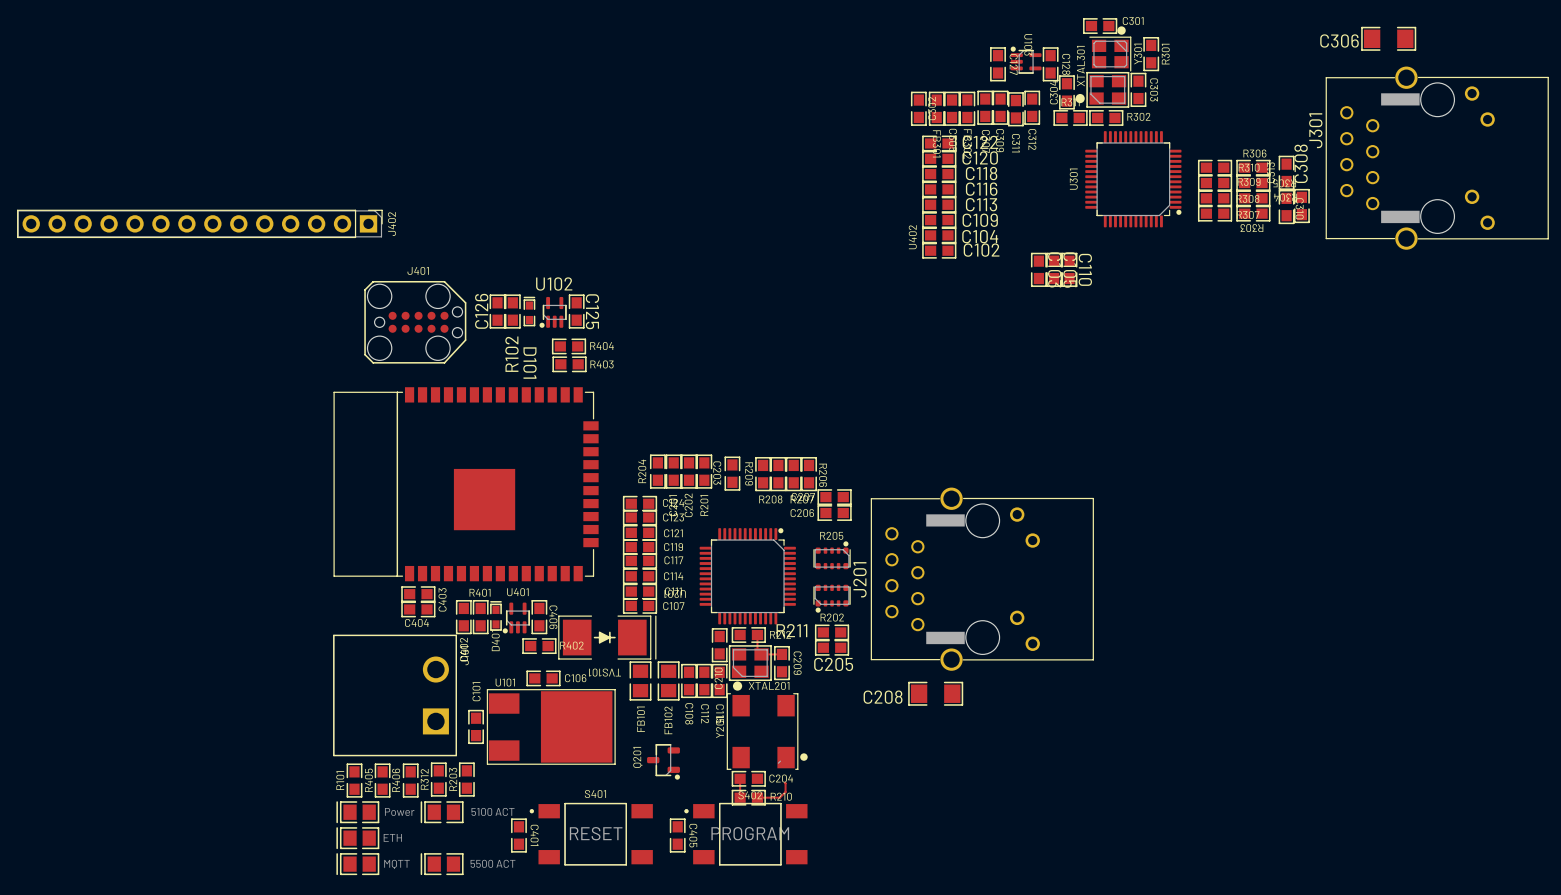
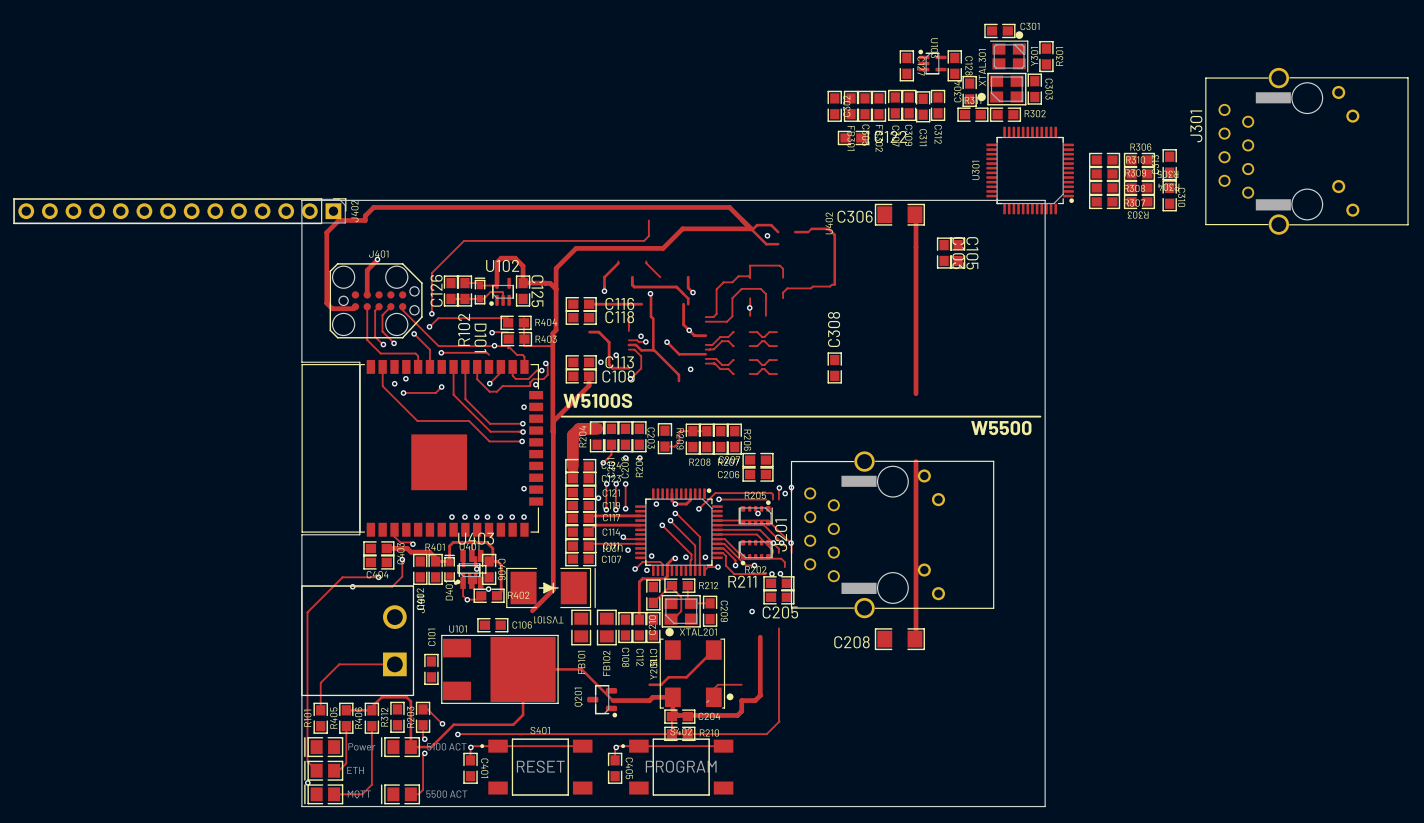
C306 position: (1388, 38) -> (899, 214)
C120: (939, 158) -> none
C118 position: (939, 174) -> (581, 317)
C116 position: (939, 189) -> (581, 304)
C113 position: (939, 204) -> (581, 362)
C308 position: (1301, 206) -> (834, 367)
board edge: none -> (301, 200) (301, 362) (359, 362) (359, 534) (301, 534) (301, 806) (1045, 806) (1045, 200) (301, 200)
C109 position: (939, 220) -> (581, 376)
track: none -> (915, 214) (916, 393)
track: none -> (648, 220) (649, 235) (644, 240) (464, 240) (431, 273) (431, 313)
C104: (939, 235) -> none
track: none -> (751, 228) (729, 207) (373, 207) (365, 215) (365, 220) (338, 220) (326, 232) (326, 303) (332, 308) (353, 308) (355, 306)
track: none -> (751, 228) (682, 228) (663, 248) (576, 248) (556, 268) (556, 330) (552, 333) (553, 432)
track: none -> (751, 228) (766, 244) (778, 244)
track: none -> (753, 228) (757, 225) (771, 225) (778, 232)
track: none -> (795, 232) (808, 232) (811, 228) (828, 228) (834, 234) (834, 284) (812, 286) (811, 288) (787, 288) (783, 292) (783, 298)
via: none -> (767, 235)
C102: (939, 250) -> none
C110: (1069, 269) -> none
via: none -> (377, 259)
track: none -> (378, 259) (367, 270) (367, 294)
track: none -> (618, 261) (604, 277) (604, 291)
track: none -> (646, 261) (660, 277)
track: none -> (632, 277) (634, 287) (676, 287) (688, 298) (688, 304)
track: none -> (688, 277) (688, 287) (693, 292)
track: none -> (783, 277) (783, 268) (779, 265) (750, 265) (750, 277) (738, 276) (732, 282) (723, 282) (716, 289) (716, 313) (713, 317) (705, 317)
track: none -> (464, 283) (494, 285) (497, 283) (497, 262) (501, 258) (515, 258) (523, 266) (523, 283) (550, 283) (556, 289)
via: none -> (604, 291)
via: none -> (693, 292)
via: none -> (650, 293)
track: none -> (651, 294) (651, 316) (652, 318)
track: none -> (750, 298) (750, 315)
track: none -> (450, 298) (483, 298) (490, 291) (502, 291) (503, 300)
track: none -> (589, 304) (641, 304)
track: none -> (683, 304) (683, 324) (694, 335) (705, 335)
track: none -> (367, 306) (367, 340) (380, 353) (415, 353) (418, 356) (418, 366)
track: none -> (379, 306) (375, 310) (375, 336) (382, 344)
track: none -> (390, 306) (382, 315) (382, 331) (394, 343)
track: none -> (402, 306) (402, 310) (438, 346) (508, 346)
via: none -> (749, 307)
via: none -> (431, 313)
track: none -> (765, 315) (765, 293) (760, 288) (741, 288) (732, 298) (732, 316) (727, 321) (705, 321)
track: none -> (628, 317) (628, 331)
track: none -> (508, 318) (438, 318) (429, 327)
track: none -> (524, 318) (524, 346) (552, 346)
track: none -> (653, 318) (653, 350)
via: none -> (429, 326)
via: none -> (689, 330)
track: none -> (508, 332) (492, 332)
track: none -> (589, 332) (598, 332) (609, 342) (609, 364) (612, 368) (628, 368)
track: none -> (733, 332) (728, 337) (720, 337) (712, 345) (705, 344)
track: none -> (749, 332) (757, 332) (762, 337) (769, 332) (777, 332)
via: none -> (492, 332)
track: none -> (414, 333) (429, 349) (429, 366)
via: none -> (414, 333)
via: none -> (641, 336)
track: none -> (628, 340) (645, 341)
via: none -> (645, 341)
track: none -> (667, 342) (679, 354) (705, 354)
via: none -> (667, 342)
via: none -> (394, 343)
via: none -> (383, 344)
track: none -> (628, 344) (635, 344) (641, 350)
via: none -> (494, 345)
track: none -> (508, 346) (517, 354) (524, 356) (524, 366)
track: none -> (508, 346) (508, 348)
track: none -> (733, 346) (728, 341) (722, 341) (713, 349) (705, 349)
track: none -> (749, 346) (757, 346) (762, 341) (769, 346) (777, 346)
track: none -> (628, 349) (634, 349) (641, 356) (641, 368) (630, 378)
track: none -> (641, 350) (653, 350)
track: none -> (653, 350) (678, 374) (678, 381)
track: none -> (441, 352) (487, 352) (489, 354)
via: none -> (441, 352)
via: none -> (616, 355)
track: none -> (705, 358) (716, 359) (722, 364) (728, 364) (733, 360)
track: none -> (749, 360) (757, 360) (762, 364) (769, 360) (777, 360)
via: none -> (600, 362)
track: none -> (544, 363) (547, 365) (547, 374) (543, 379) (533, 379) (529, 386) (502, 386) (497, 391) (489, 391) (477, 379) (477, 366)
via: none -> (545, 363)
track: none -> (705, 363) (714, 363) (720, 369) (728, 369) (733, 374)
track: none -> (382, 366) (382, 386) (417, 420) (469, 420) (489, 441) (522, 441)
track: none -> (453, 366) (453, 394) (490, 431) (523, 431)
track: none -> (465, 366) (465, 399) (490, 423) (522, 423)
track: none -> (500, 366) (500, 372) (489, 383)
track: none -> (512, 366) (512, 375) (515, 378) (528, 378) (536, 370) (541, 370)
via: none -> (690, 369)
via: none -> (541, 370)
track: none -> (749, 374) (757, 374) (762, 369) (769, 374) (777, 374)
track: none -> (589, 376) (589, 385) (553, 421) (553, 589) (532, 610)
via: none -> (405, 378)
via: none -> (630, 378)
via: none -> (394, 383)
via: none -> (489, 383)
via: none -> (535, 384)
track: none -> (441, 387) (435, 392) (403, 392)
via: none -> (441, 387)
via: none -> (403, 392)
text: none -> W5100S (597, 400)
via: none -> (524, 407)
line: none -> (561, 416) (1040, 416)
via: none -> (522, 423)
text: none -> W5500 (1001, 428)
track: none -> (597, 428) (579, 428) (572, 435) (572, 466)
track: none -> (706, 431) (680, 431) (679, 441) (674, 446) (664, 446)
via: none -> (523, 431)
via: none -> (522, 441)
track: none -> (611, 444) (611, 454) (603, 462)
via: none -> (625, 457)
via: none -> (639, 457)
track: none -> (916, 461) (915, 639)
via: none -> (603, 462)
track: none -> (606, 483) (606, 509)
via: none -> (606, 483)
track: none -> (616, 484) (615, 509)
via: none -> (616, 483)
track: none -> (625, 484) (625, 508)
via: none -> (625, 483)
track: none -> (779, 487) (778, 499)
via: none -> (779, 487)
via: none -> (791, 487)
via: none -> (524, 488)
via: none -> (785, 493)
track: none -> (671, 493) (671, 500) (675, 504) (686, 504) (690, 500) (690, 493)
via: none -> (598, 498)
track: none -> (719, 498) (766, 499)
via: none -> (719, 499)
track: none -> (772, 499) (771, 493) (715, 493) (698, 508)
via: none -> (656, 504)
via: none -> (675, 504)
via: none -> (625, 508)
via: none -> (698, 508)
via: none -> (606, 509)
via: none -> (615, 509)
via: none -> (675, 513)
track: none -> (676, 513) (699, 536) (699, 570)
via: none -> (758, 513)
track: none -> (640, 515) (591, 515) (588, 518)
via: none -> (451, 517)
via: none -> (464, 517)
via: none -> (476, 517)
via: none -> (487, 517)
via: none -> (500, 517)
via: none -> (512, 517)
via: none -> (524, 517)
track: none -> (670, 520) (695, 545) (695, 570)
via: none -> (670, 520)
track: none -> (717, 520) (768, 520) (791, 543) (791, 553)
track: none -> (640, 525) (595, 525) (588, 532)
track: none -> (662, 525) (691, 554) (690, 570)
via: none -> (662, 525)
track: none -> (717, 525) (764, 525) (784, 546)
track: none -> (394, 529) (394, 536) (400, 542) (411, 543)
track: none -> (717, 529) (759, 529) (778, 548) (778, 553)
track: none -> (717, 534) (756, 534) (772, 550) (772, 553)
via: none -> (623, 537)
track: none -> (624, 538) (623, 537) (625, 539) (640, 539)
track: none -> (717, 539) (724, 539) (744, 559) (781, 558) (784, 562) (784, 567)
track: none -> (472, 542) (471, 555)
via: none -> (773, 543)
via: none -> (781, 543)
via: none -> (791, 543)
via: none -> (412, 544)
track: none -> (640, 543) (591, 543) (588, 546)
track: none -> (717, 543) (724, 543) (745, 565) (754, 564)
track: none -> (386, 548) (407, 548) (410, 552) (429, 552) (435, 558) (435, 561) (449, 562) (449, 546) (453, 542) (486, 542) (492, 548) (492, 561) (497, 561) (501, 565) (501, 591) (497, 595)
track: none -> (717, 548) (723, 548) (735, 560) (735, 565)
via: none -> (628, 550)
track: none -> (717, 553) (722, 553) (725, 556) (725, 565) (734, 574) (766, 573)
via: none -> (651, 556)
via: none -> (685, 557)
via: none -> (705, 557)
track: none -> (675, 557) (667, 564) (667, 576) (664, 578) (642, 578) (639, 581) (639, 619)
via: none -> (675, 558)
track: none -> (402, 559) (402, 576) (392, 586) (352, 586)
via: none -> (402, 559)
via: none -> (735, 565)
via: none -> (754, 565)
track: none -> (717, 567) (708, 567) (704, 570)
via: none -> (717, 567)
via: none -> (476, 569)
via: none -> (635, 569)
track: none -> (635, 569) (642, 561) (660, 561) (662, 564) (662, 570)
U403: none -> (470, 569)
via: none -> (646, 570)
via: none -> (780, 573)
via: none -> (771, 574)
track: none -> (378, 577) (342, 577) (307, 612) (307, 761) (316, 770) (316, 774)
via: none -> (378, 577)
track: none -> (463, 582) (463, 595) (467, 600)
R211 position: (832, 632) -> (778, 583)
via: none -> (352, 586)
via: none -> (488, 589)
C205 position: (832, 647) -> (778, 597)
via: none -> (467, 599)
track: none -> (482, 599) (467, 600)
track: none -> (653, 603) (668, 587) (671, 587) (681, 597) (681, 611) (672, 619)
via: none -> (752, 611)
track: none -> (778, 628) (779, 721) (766, 734) (458, 734)
track: none -> (760, 637) (760, 695) (755, 700) (741, 700) (741, 711) (737, 715) (677, 715) (672, 710) (672, 697) (652, 697) (649, 700) (612, 700) (581, 669) (523, 669) (523, 714) (513, 724) (453, 724) (431, 747) (410, 747) (410, 701)
C208 position: (935, 693) -> (899, 639)
track: none -> (713, 650) (686, 677) (668, 677) (661, 684) (649, 684)
track: none -> (394, 664) (339, 664) (320, 682) (320, 710)
track: none -> (741, 684) (717, 684) (713, 688) (713, 697)
track: none -> (410, 701) (406, 697) (381, 697) (371, 707) (371, 710) (346, 710)
track: none -> (423, 709) (427, 709) (442, 723)
track: (785, 782) (785, 792) (779, 797) (757, 797) -> none
via: none -> (442, 723)
track: none -> (423, 725) (424, 738)
track: none -> (346, 726) (346, 763) (338, 770) (334, 770)
track: none -> (371, 726) (371, 784) (362, 794) (334, 794)
via: none -> (457, 734)
via: none -> (424, 739)
track: none -> (582, 746) (472, 746) (470, 748) (470, 760)
track: none -> (723, 746) (617, 746) (615, 749) (615, 760)
via: none -> (470, 747)
via: none -> (616, 747)
track: none -> (424, 754) (423, 755) (423, 789) (418, 794) (410, 794)
via: none -> (424, 753)
via: none -> (307, 782)

